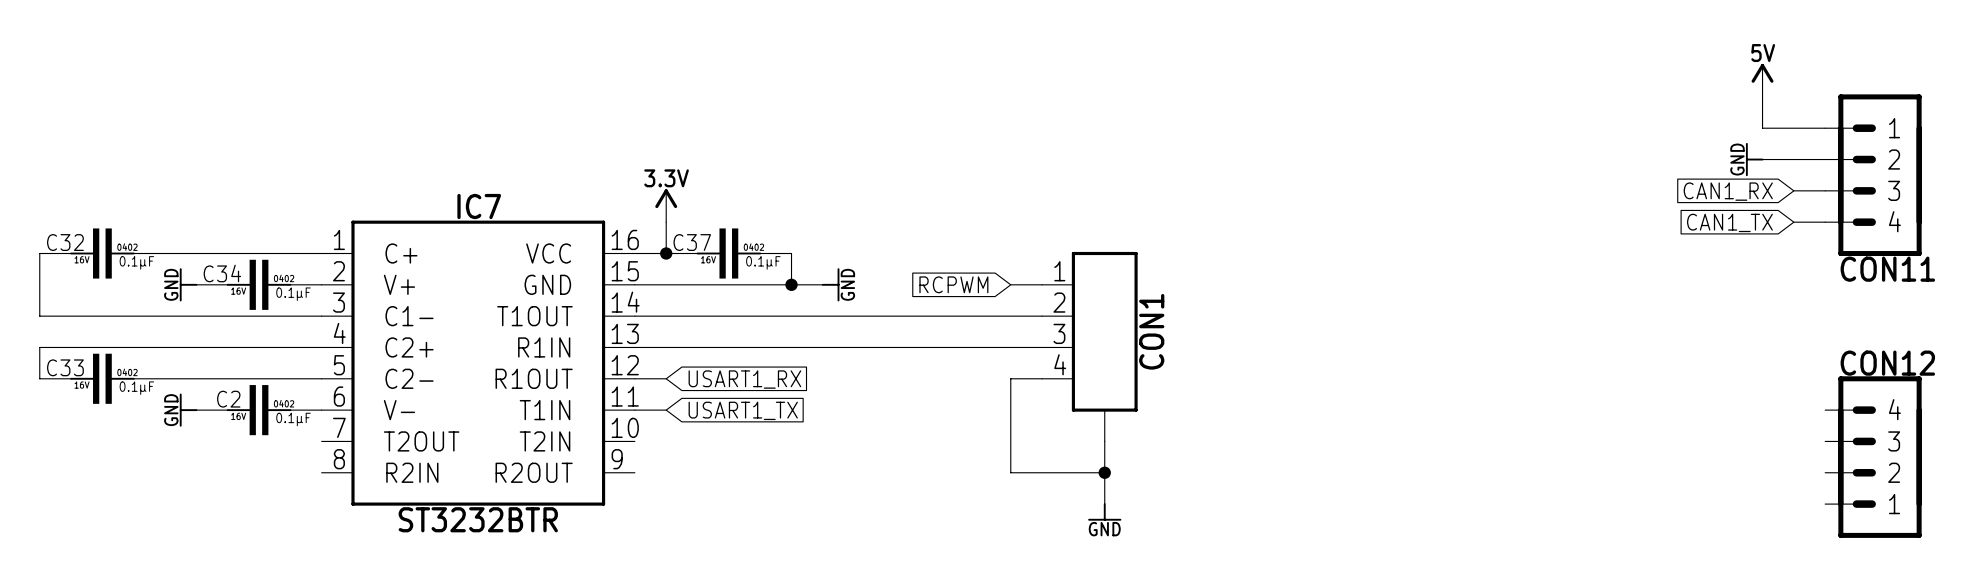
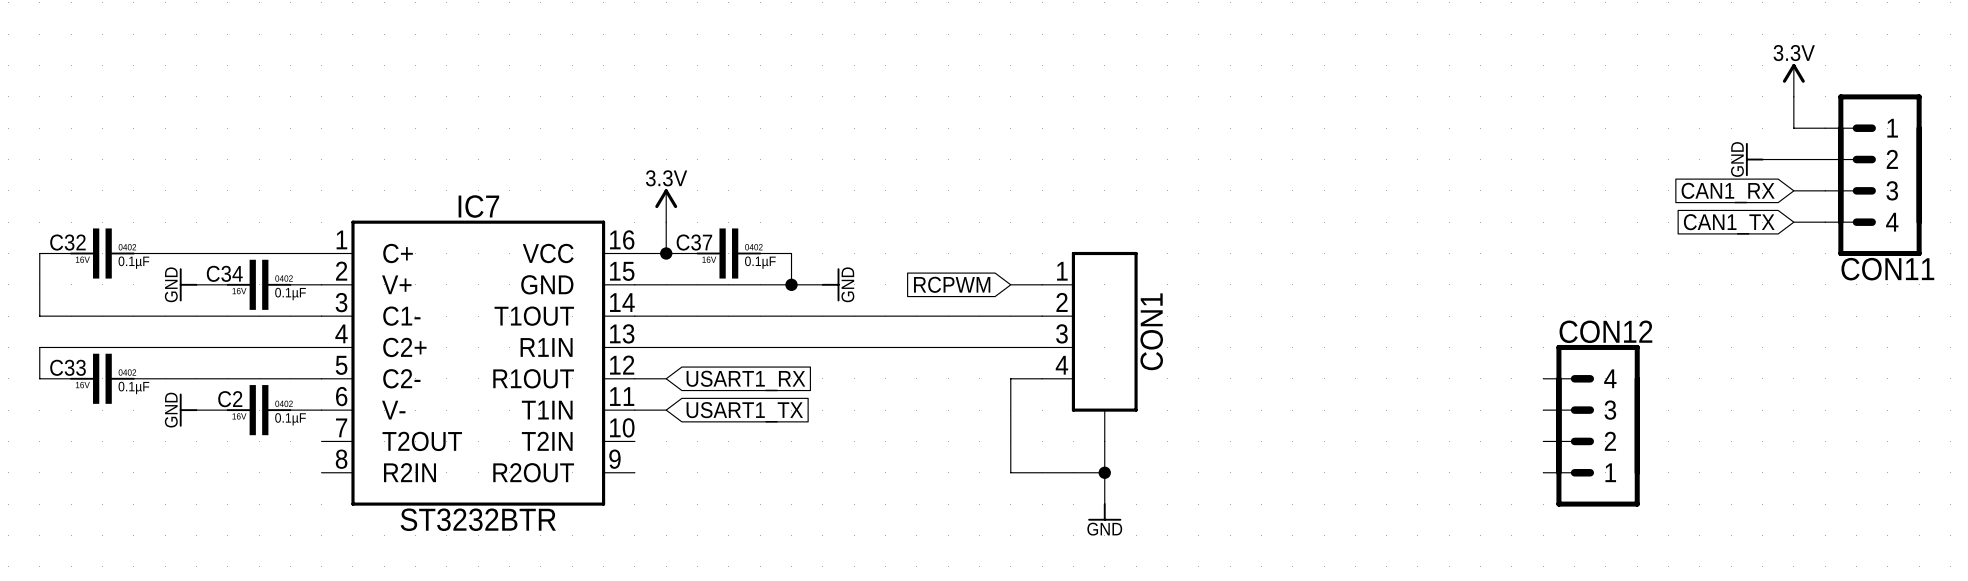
power symbol: 5V (1762, 80) -> none
power symbol: none -> 3.3V (1793, 80)
wire: (1762, 96) (1762, 128) (1793, 128) -> (1793, 96) (1793, 128)
CON12 position: (1873, 457) -> (1591, 425)

